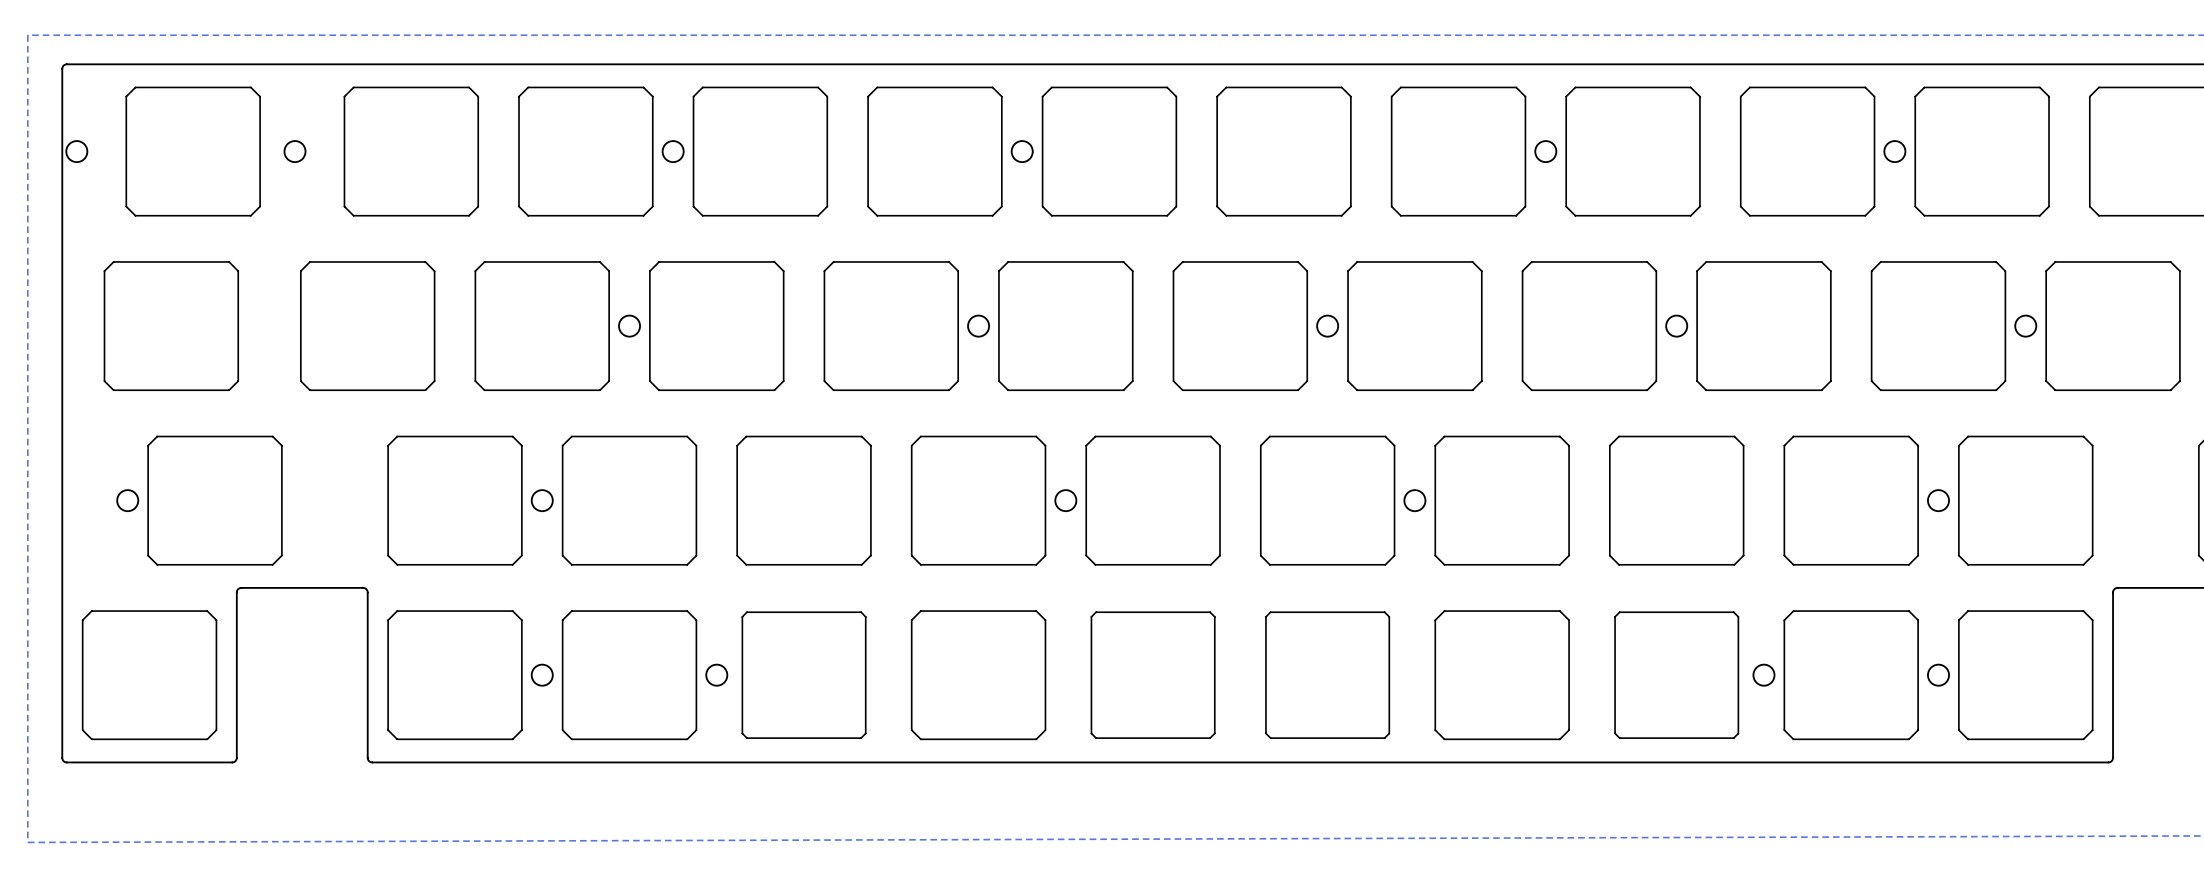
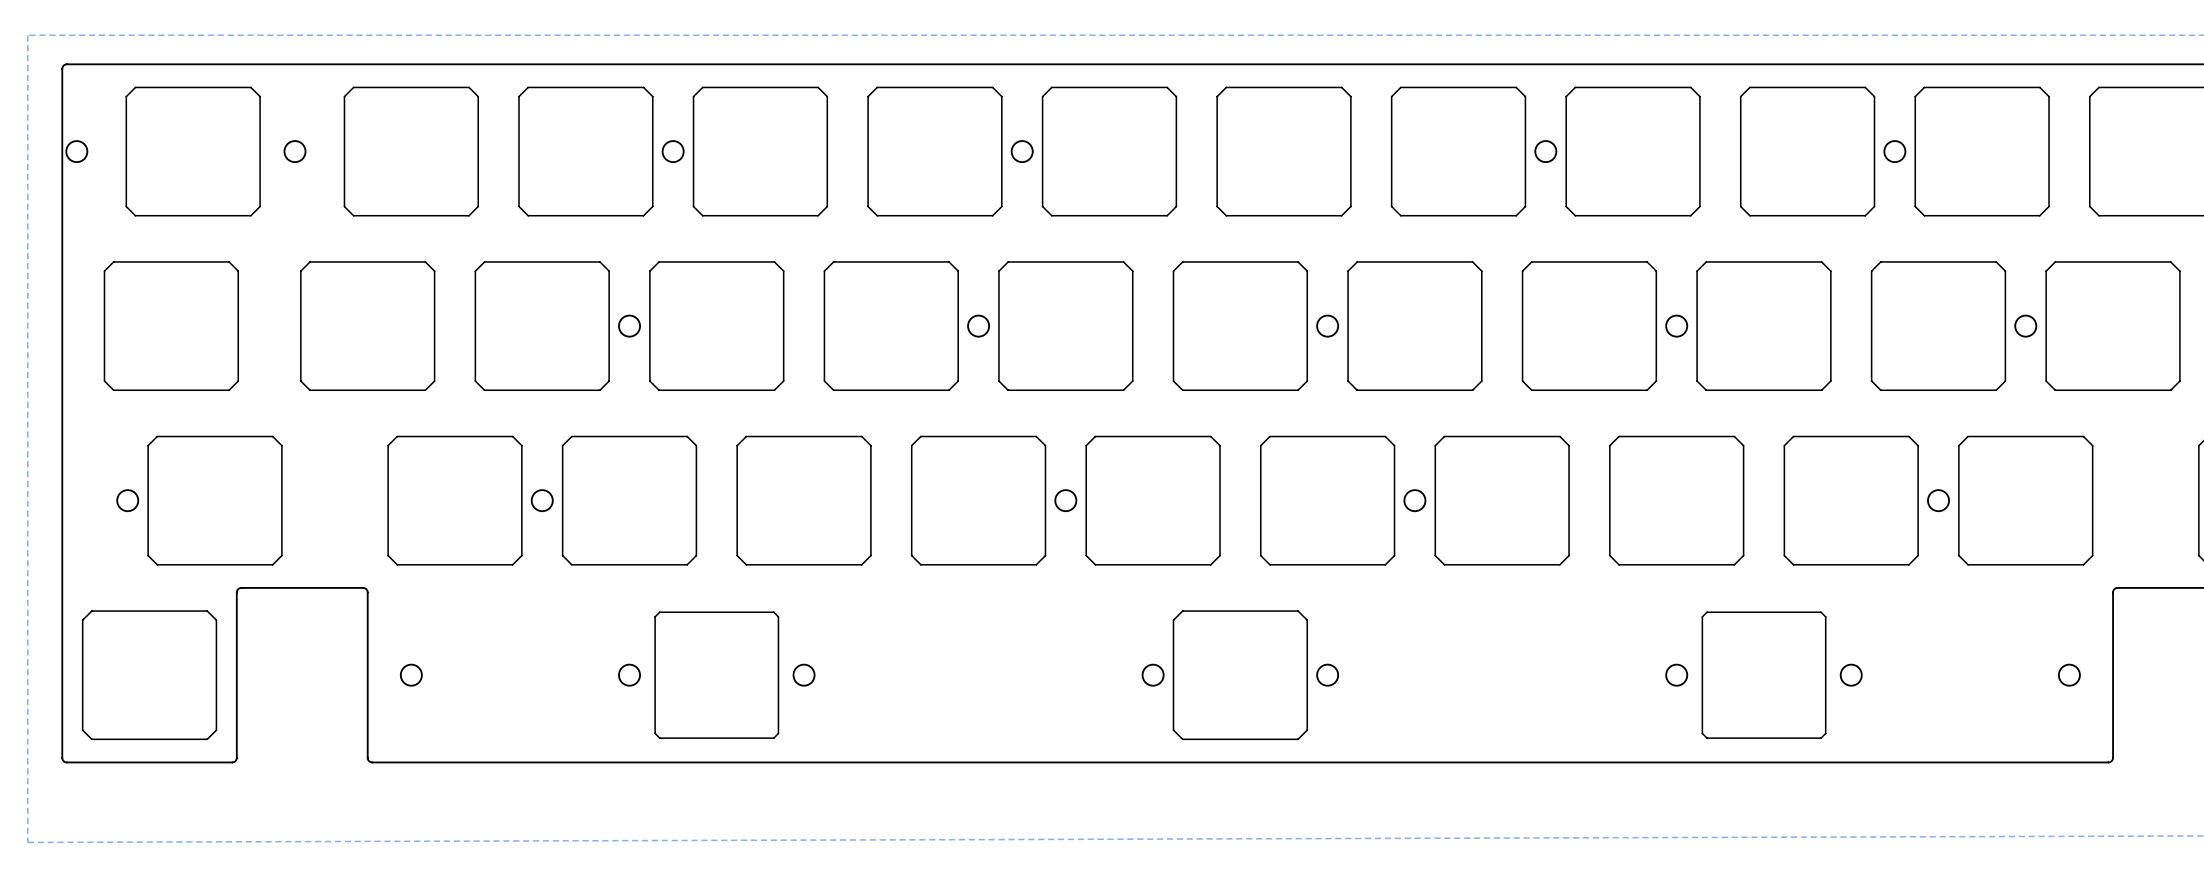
drawing: [387, 610, 523, 740] -> none
drawing: [562, 610, 697, 740] -> none
drawing: none -> [654, 610, 1827, 740]
drawing: [741, 610, 1216, 740] -> none
drawing: [1265, 610, 1739, 740] -> none
drawing: [1783, 610, 1919, 740] -> none
drawing: [1958, 610, 2094, 740] -> none
round board edge: none -> [399, 663, 423, 687]
round board edge: [530, 663, 554, 687] -> none
round board edge: none -> [618, 663, 641, 687]
round board edge: [705, 663, 729, 687] -> none
round board edge: none -> [792, 663, 816, 687]
round board edge: none -> [1141, 663, 1165, 687]
round board edge: none -> [1316, 663, 1340, 687]
round board edge: none -> [1665, 663, 1689, 687]
round board edge: [1752, 663, 1776, 687] -> none
round board edge: none -> [1839, 663, 1863, 687]
round board edge: [1927, 663, 1950, 687] -> none
round board edge: none -> [2057, 663, 2081, 687]

